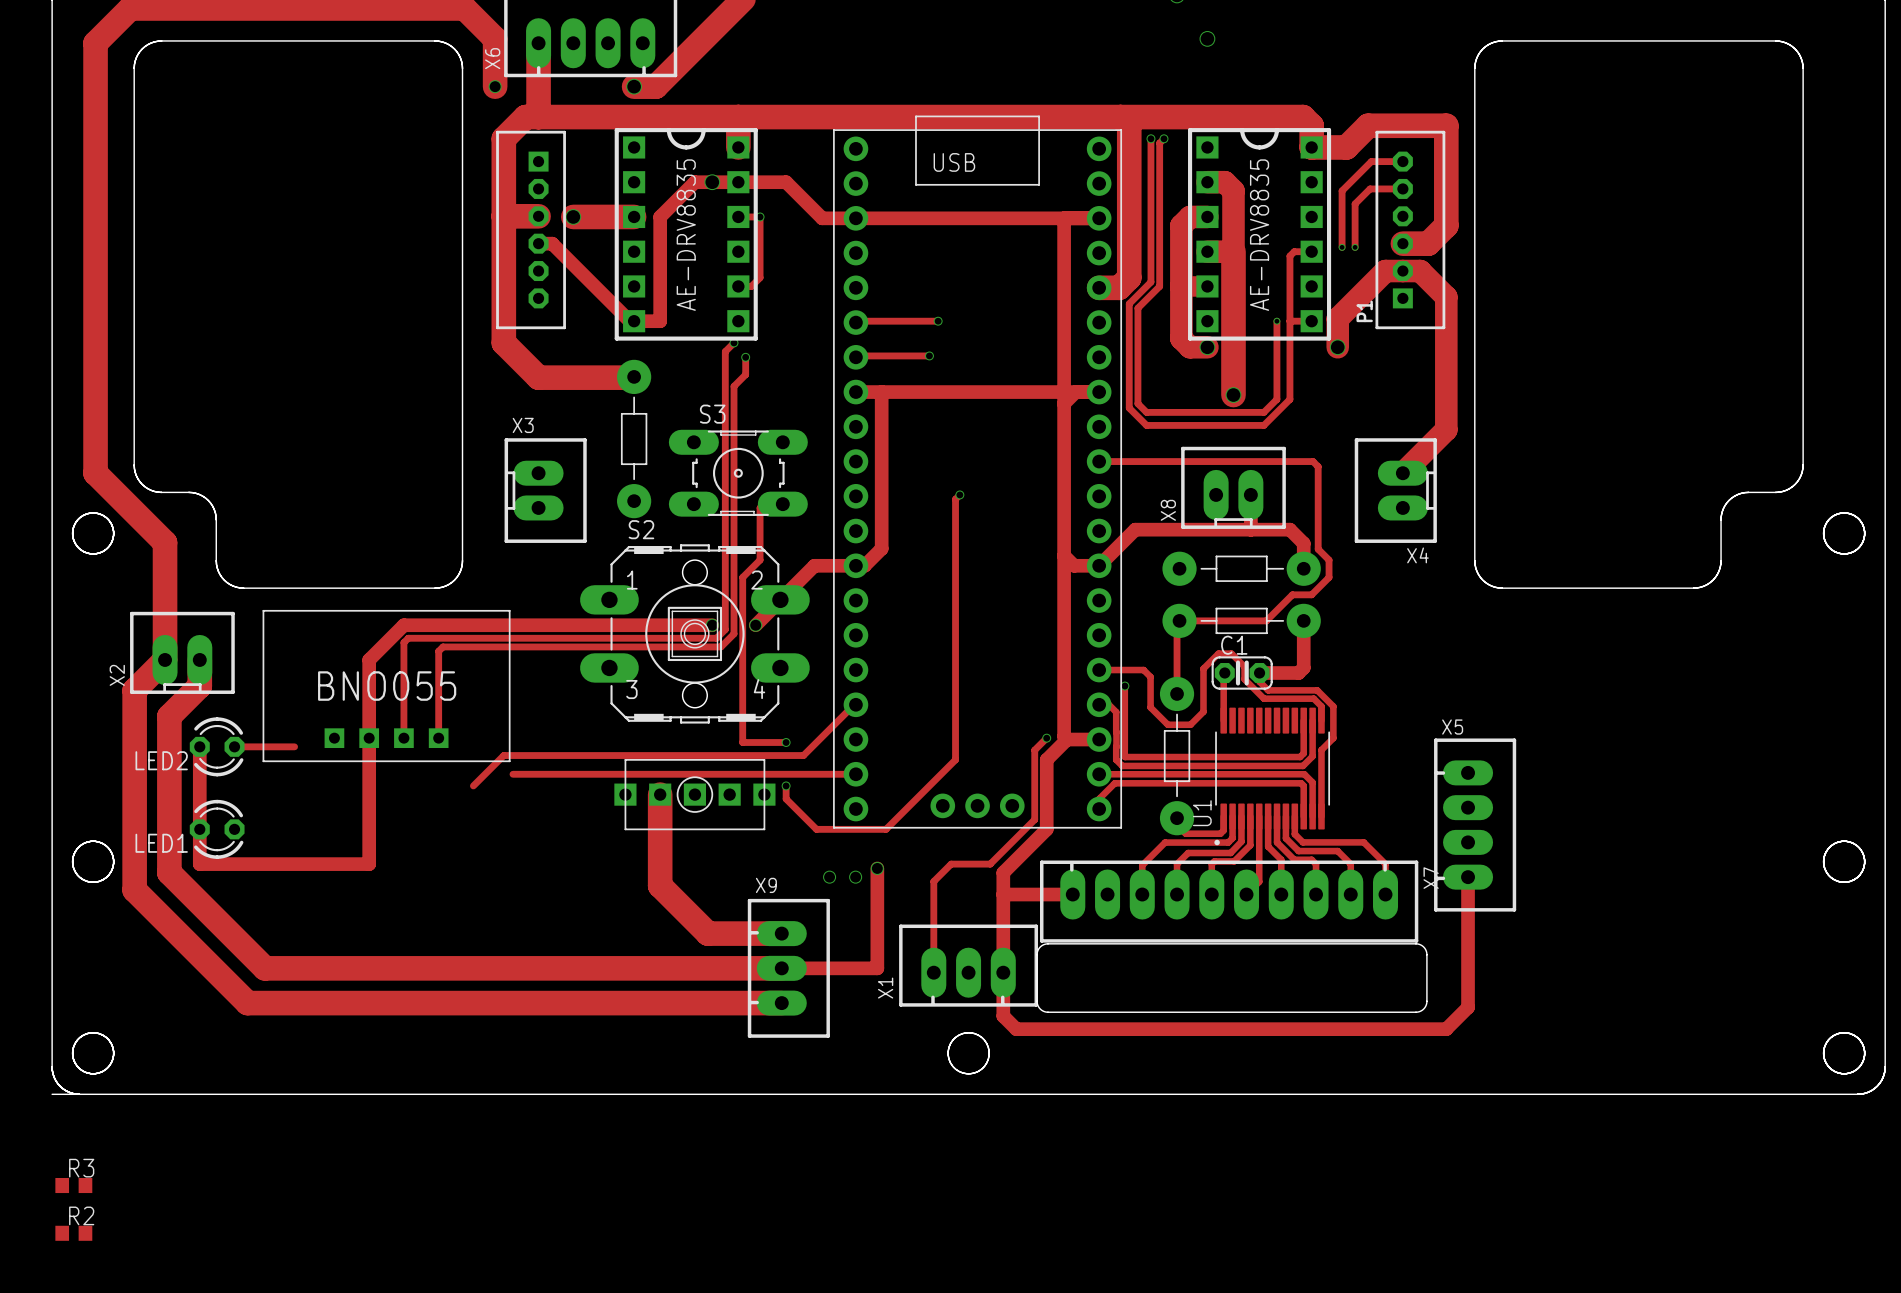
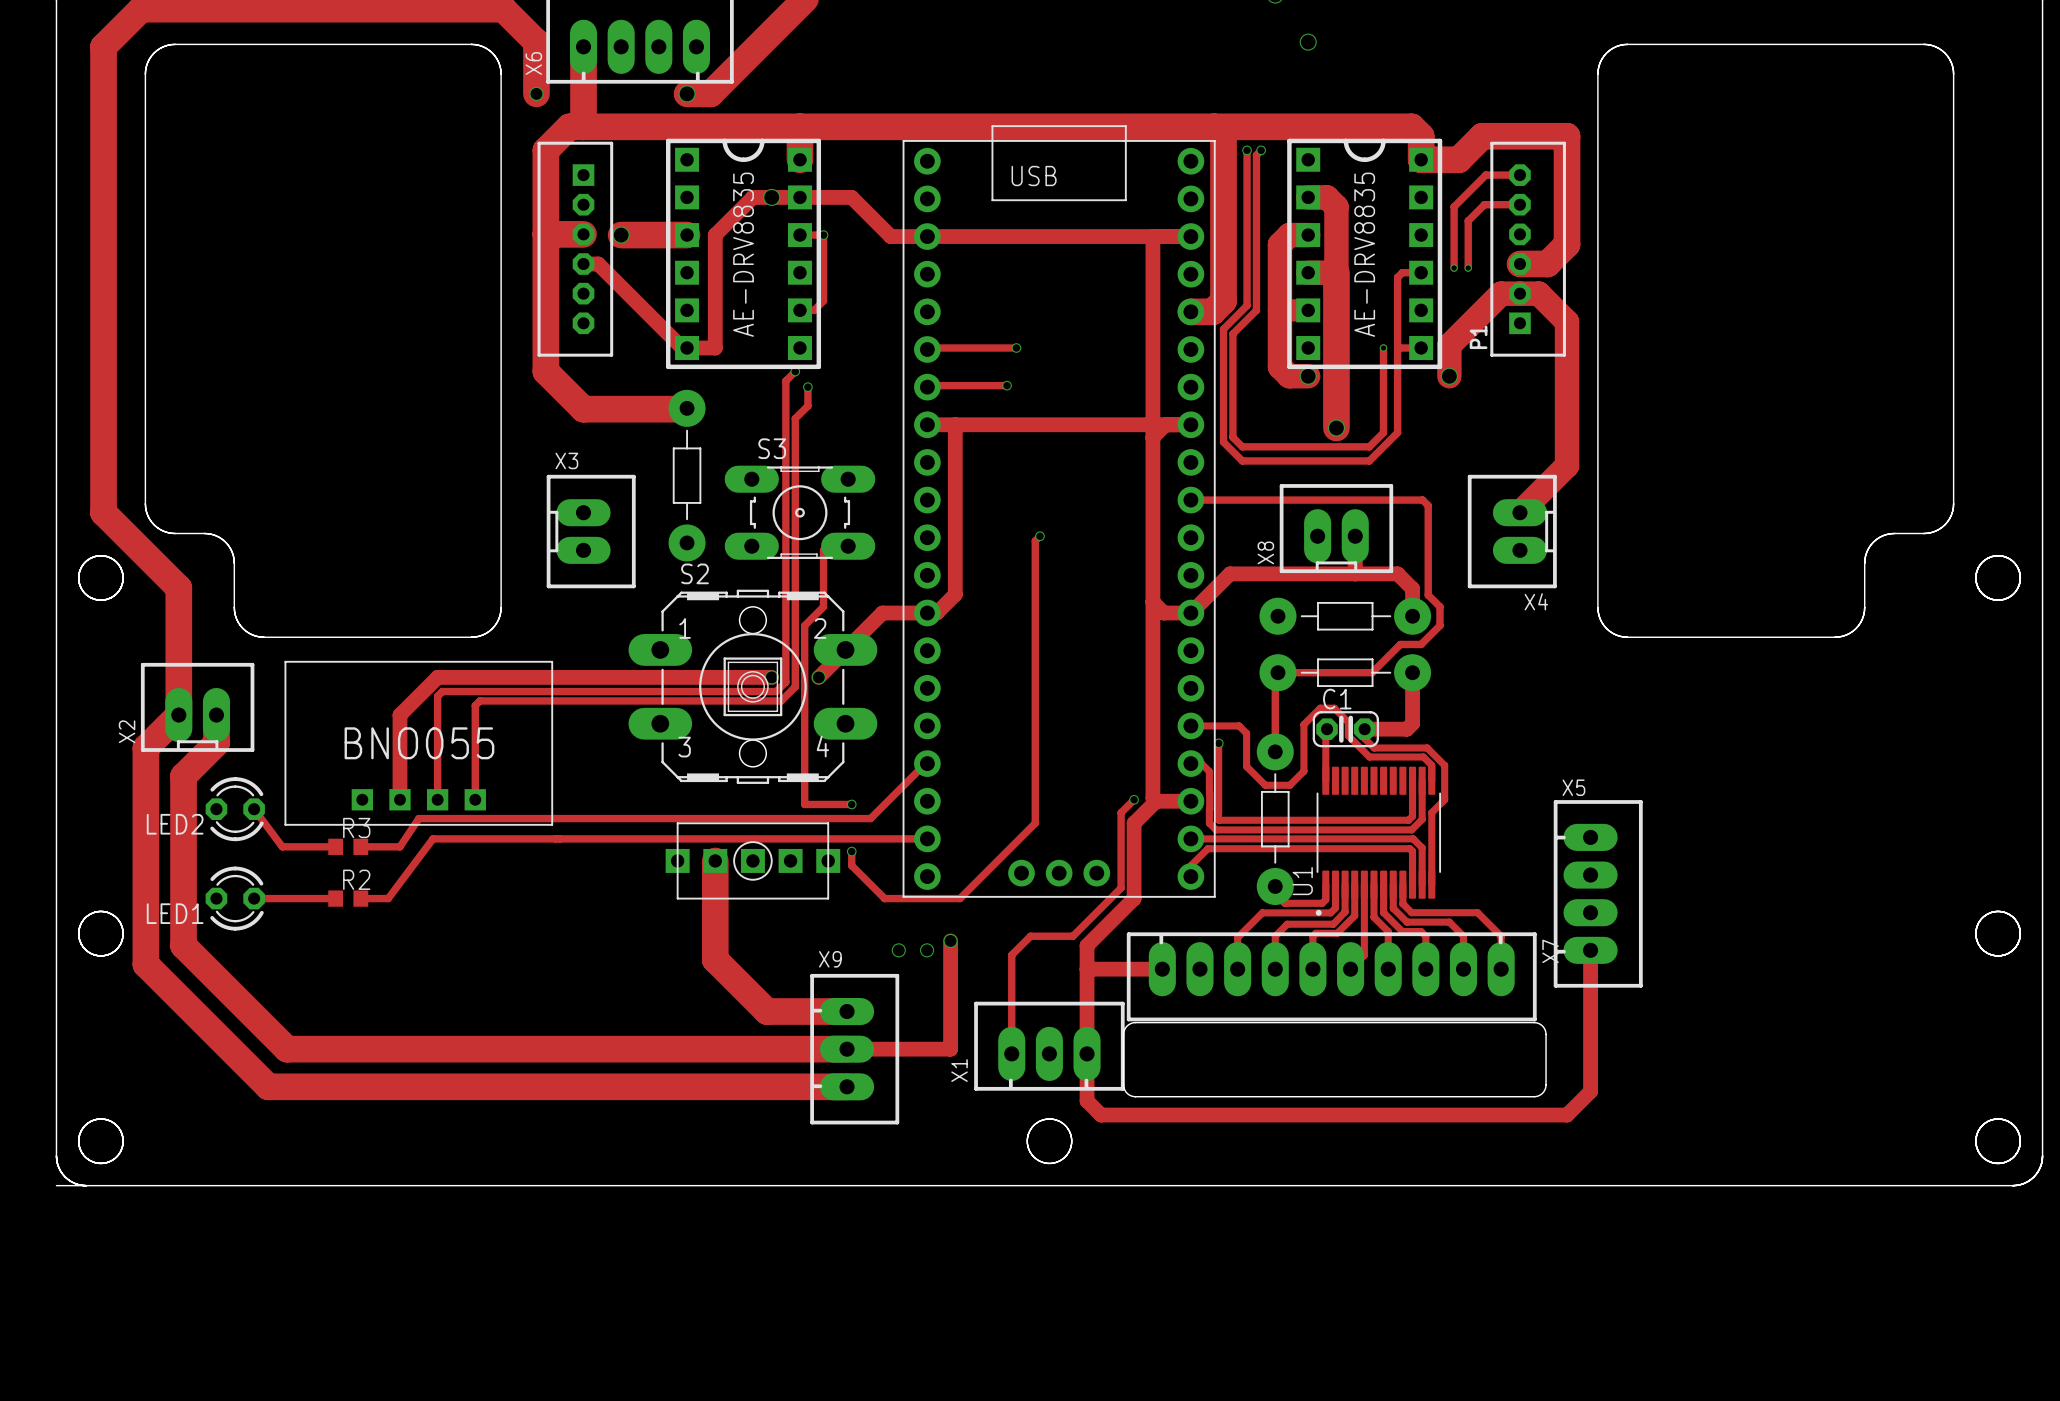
track: (369, 738) (369, 864) (199, 864) (199, 746) -> none
track: (234, 746) (294, 746) -> (254, 809) (282, 846) (335, 846)
track: (503, 755) (473, 785) -> (545, 818) (418, 818) (399, 846) (360, 846)
track: none -> (555, 838) (433, 838) (388, 898) (360, 898)
track: none -> (254, 898) (335, 898)
R3 position: (73, 1185) -> (348, 846)
R2 position: (73, 1233) -> (348, 898)

